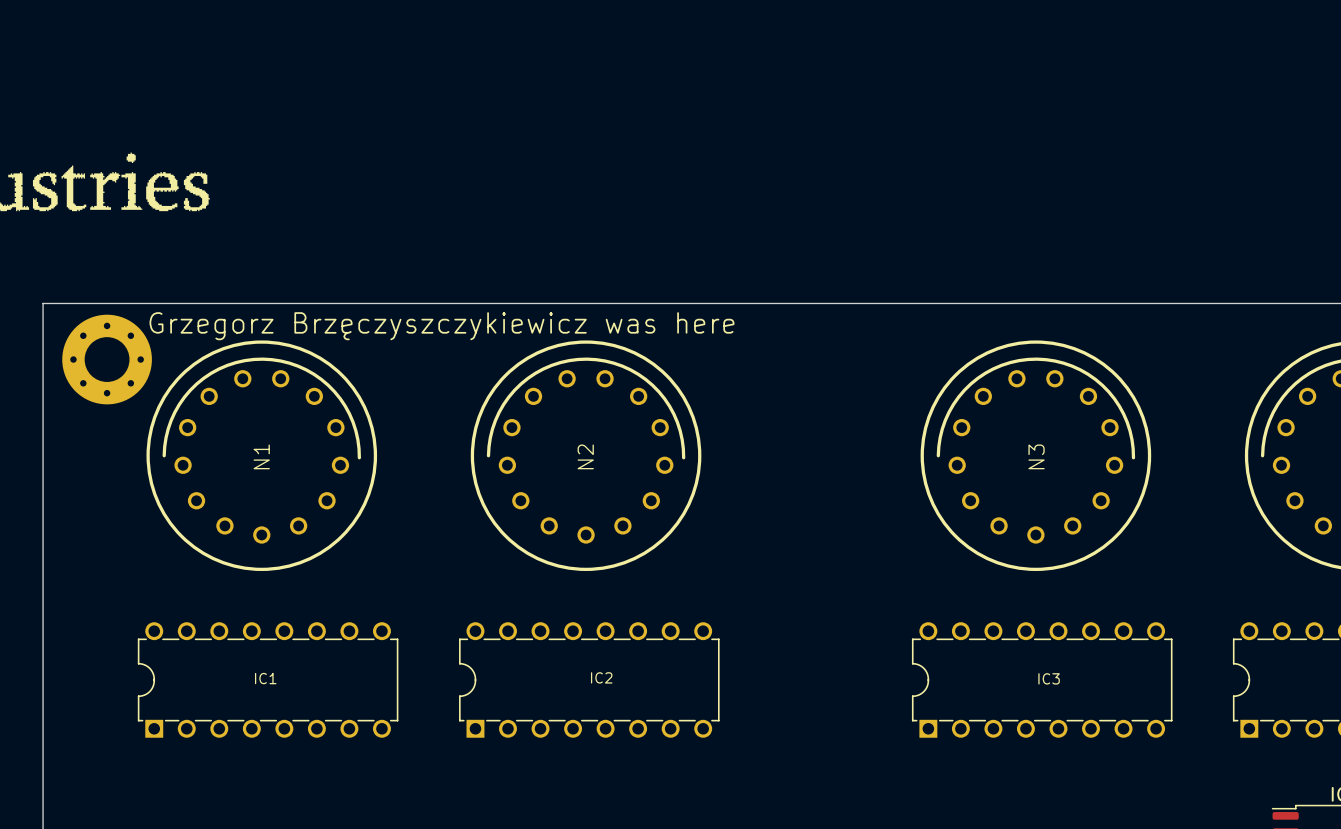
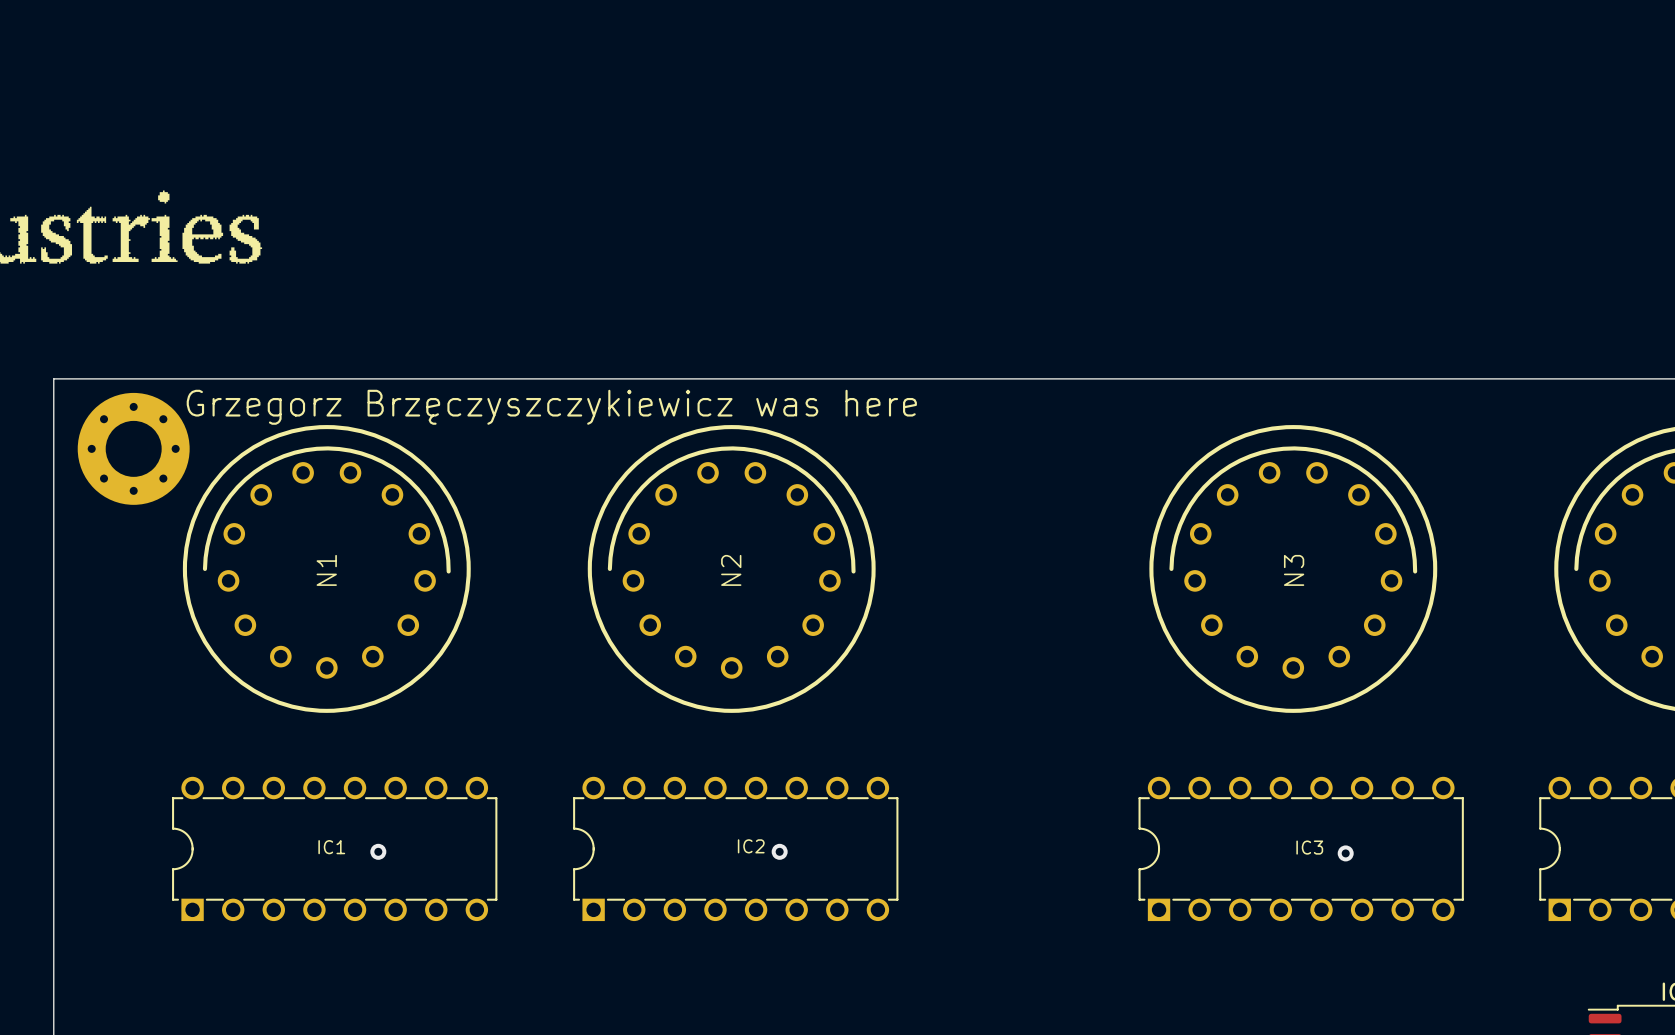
via: none -> (378, 851)
via: none -> (779, 851)
via: none -> (1345, 853)

